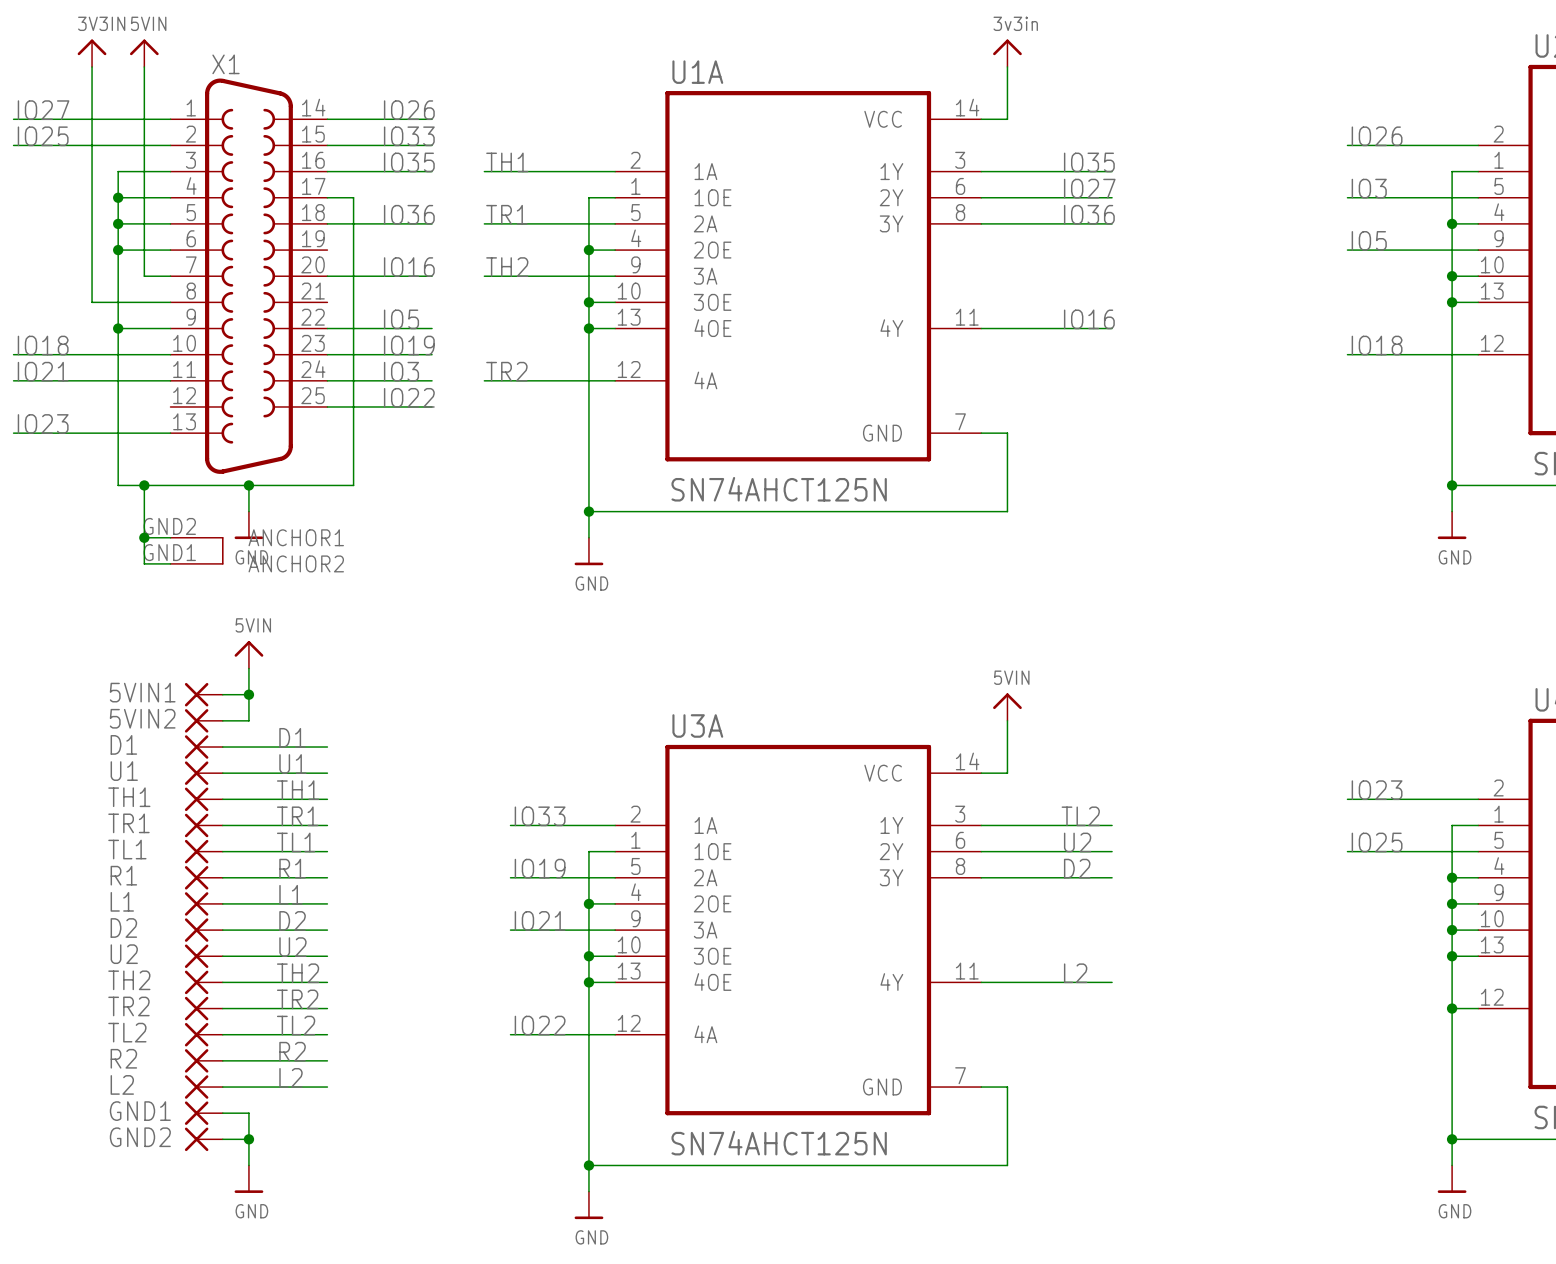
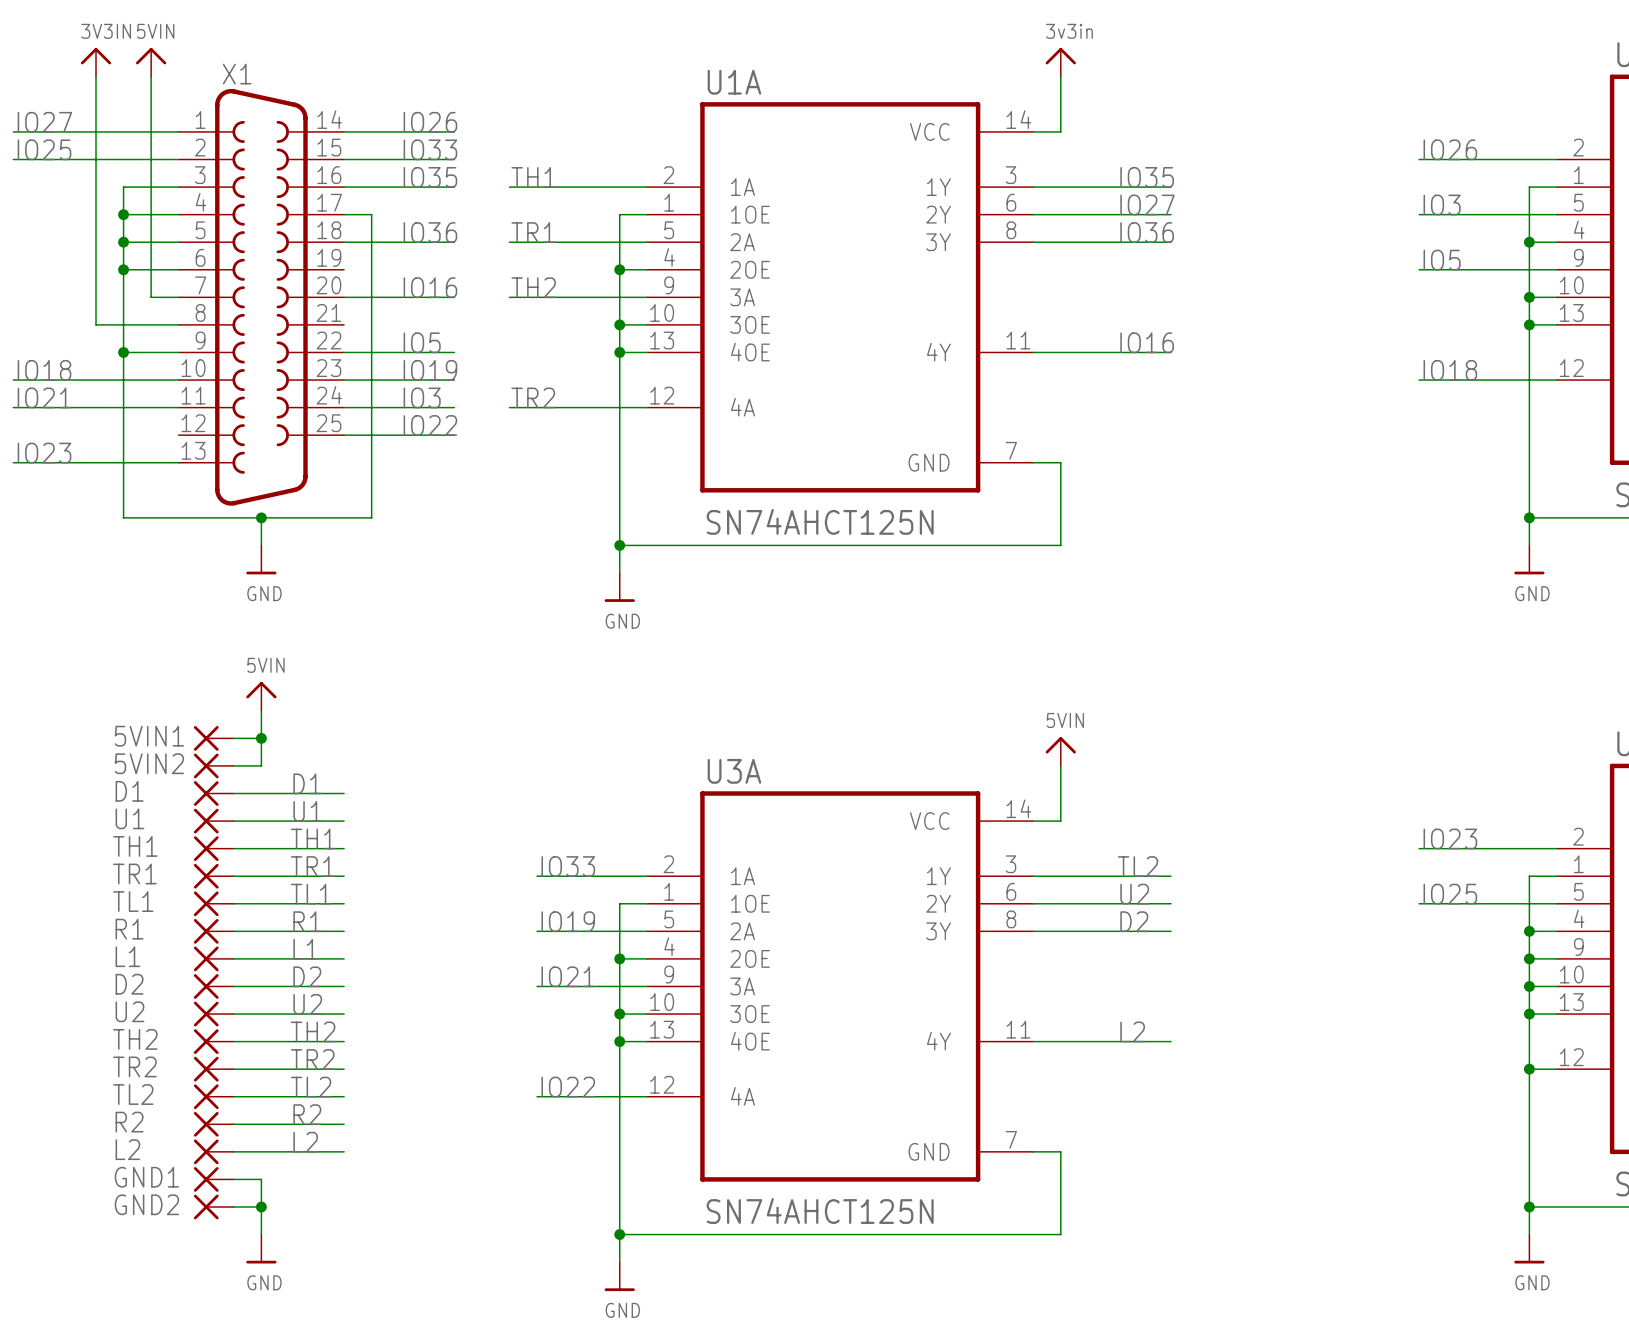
X1 symbol: [170, 78, 328, 565] -> [178, 88, 345, 506]
wire: (144, 485) (144, 563) (170, 563) -> none
junction: (144, 485) -> none
wire: (144, 537) (170, 537) -> none
junction: (144, 537) -> none

